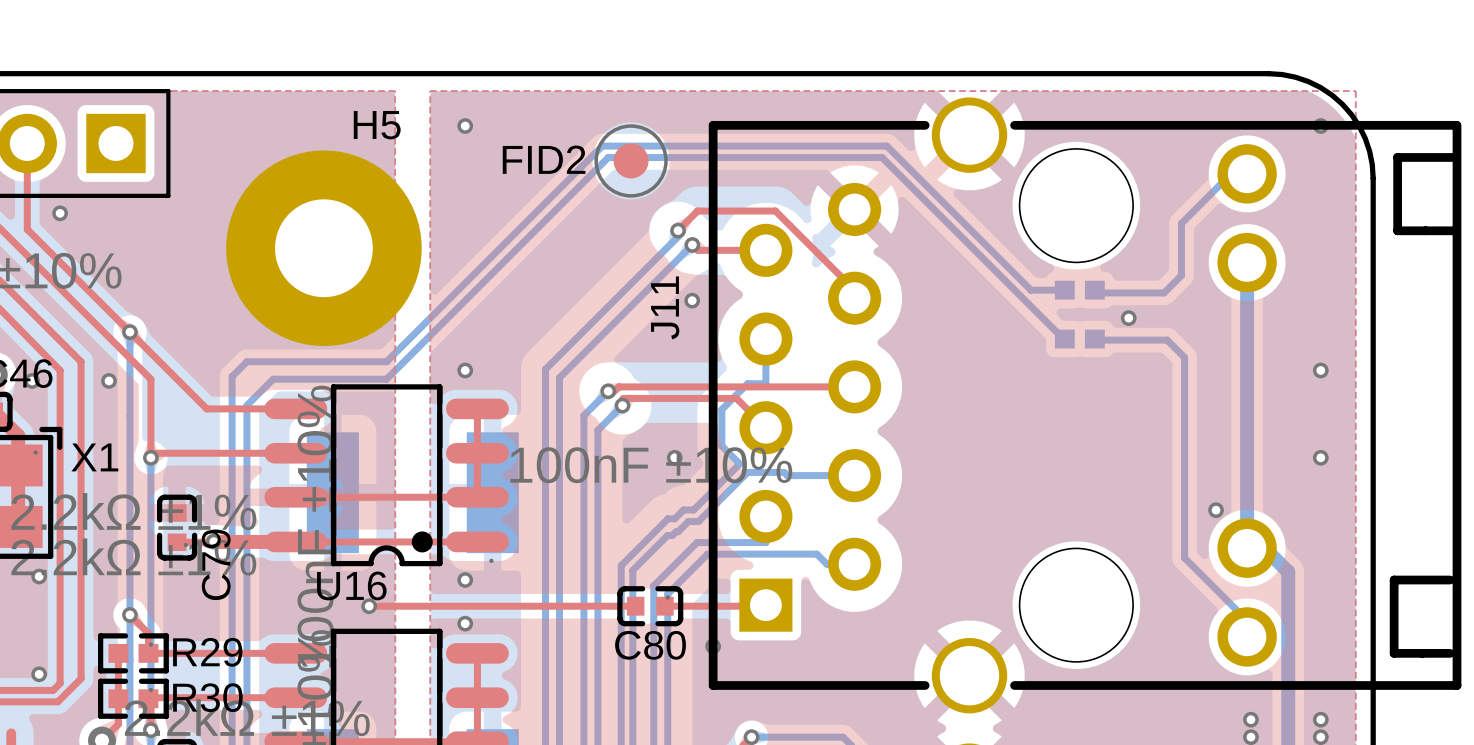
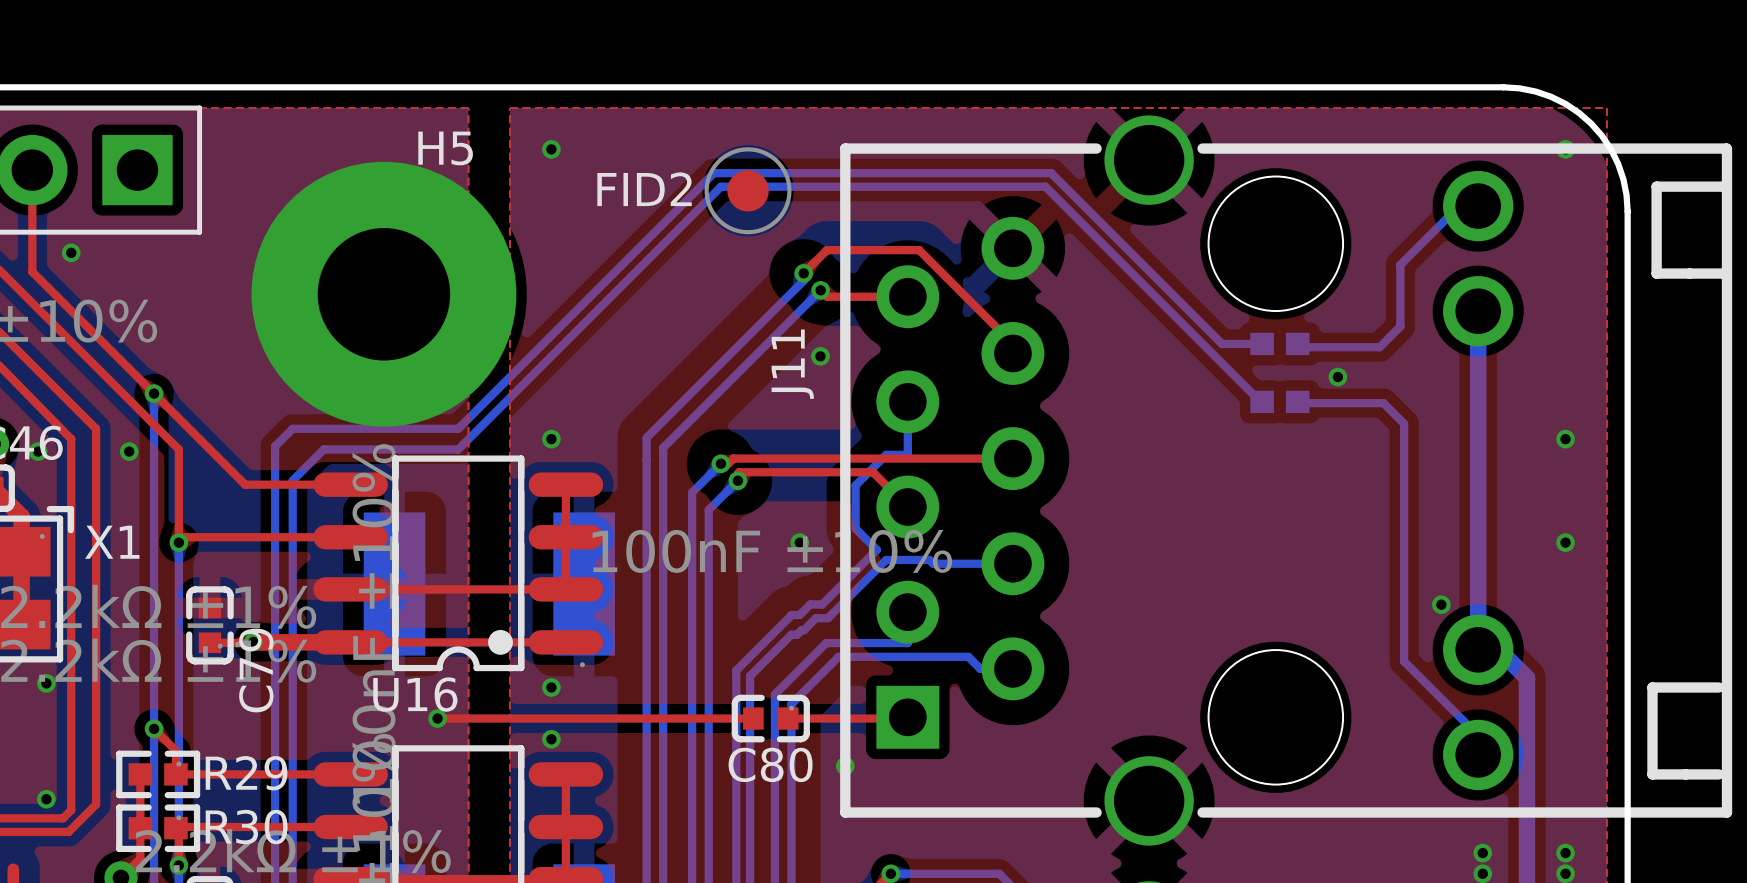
H5 footprint: [226, 150, 422, 347] -> [251, 161, 517, 427]

